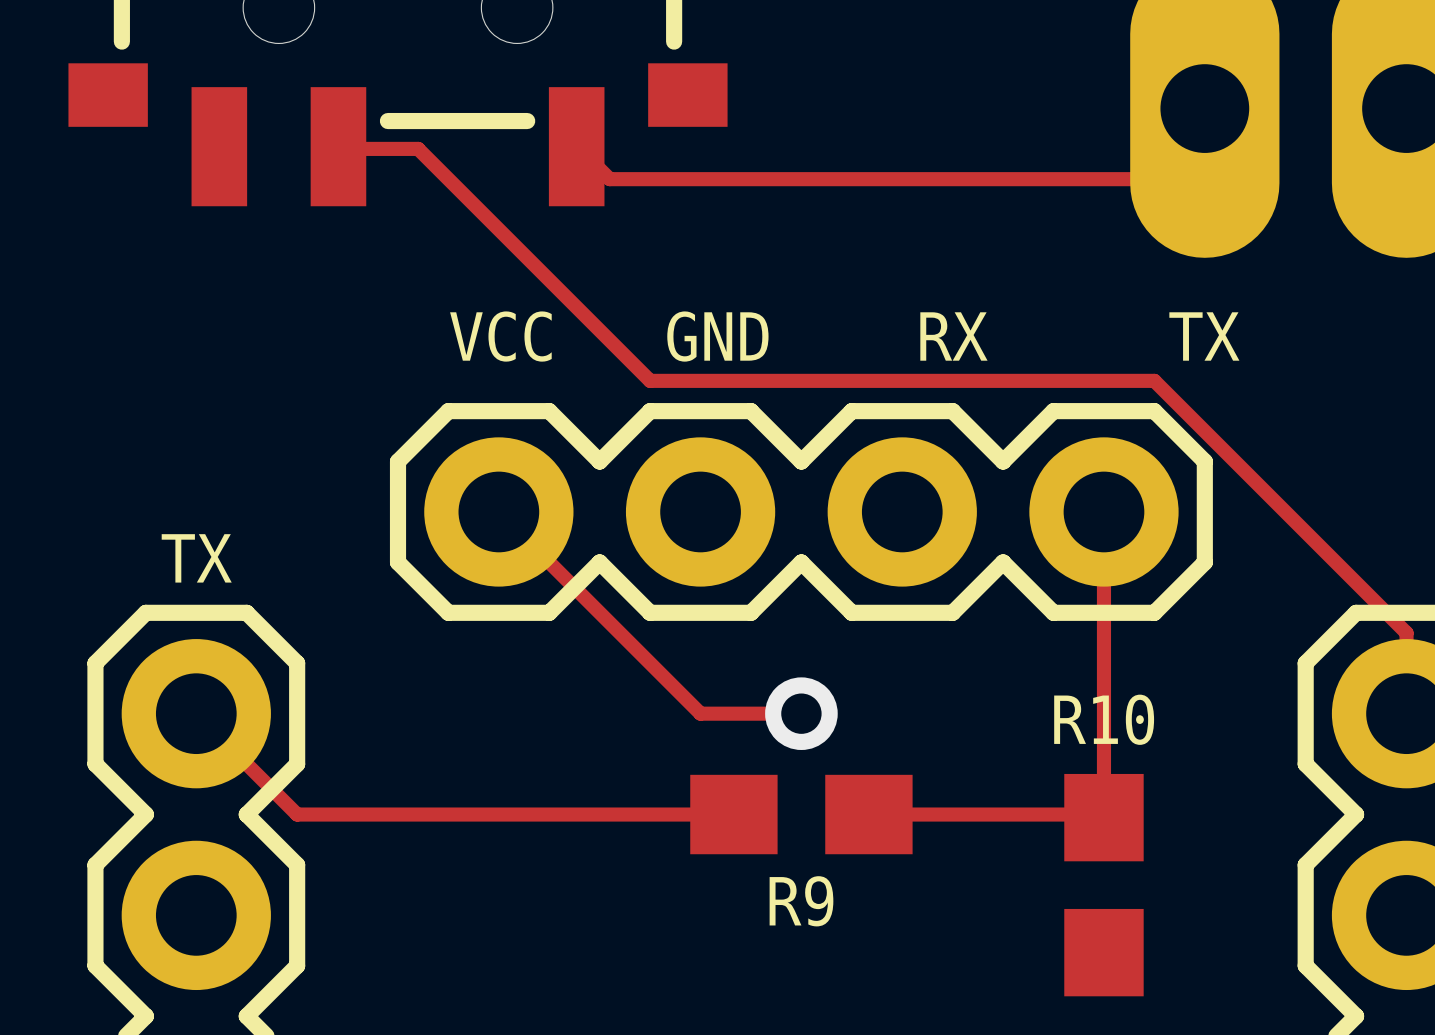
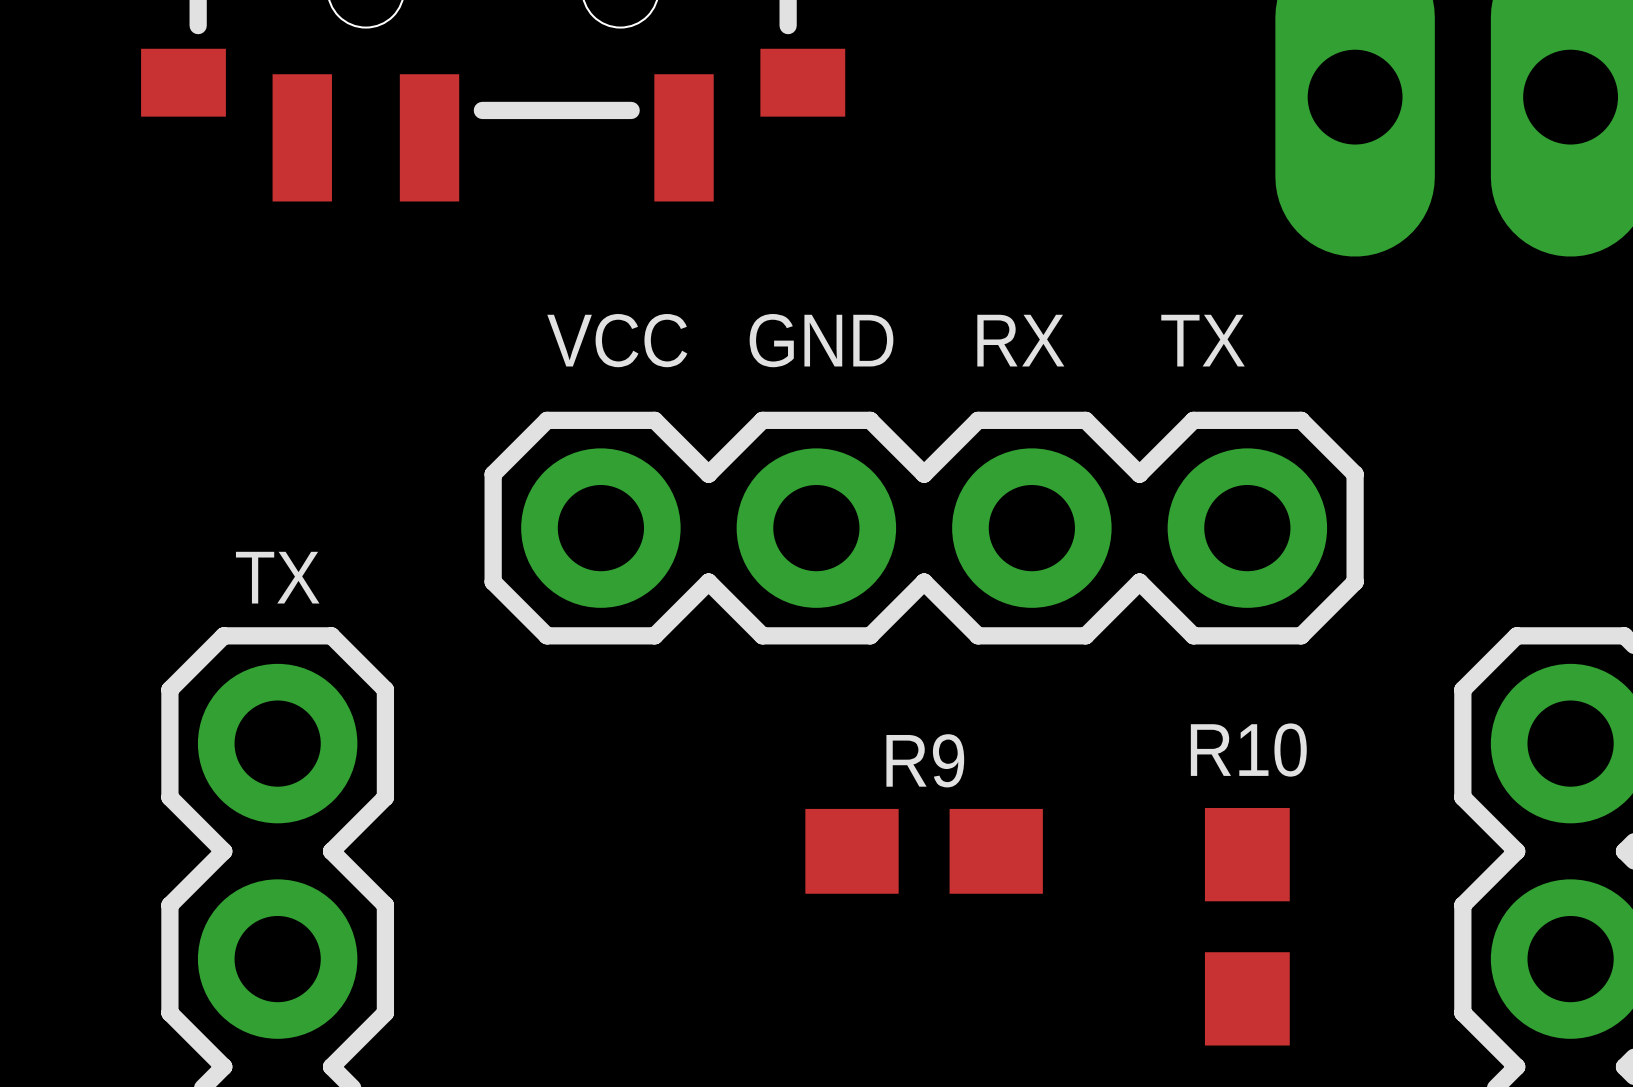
track: (1204, 108) (1134, 179) (609, 179) (576, 146) -> none
track: (338, 146) (347, 148) (418, 148) (650, 380) (1154, 380) (1406, 633) (1406, 713) -> none
track: (498, 511) (700, 713) (801, 713) -> none
track: (1103, 511) (1103, 817) -> none
track: (196, 713) (297, 814) (733, 814) -> none
via: (801, 713) -> none
track: (868, 814) (1103, 814) -> none
R9 name position: R9 (801, 901) -> R9 (925, 760)

